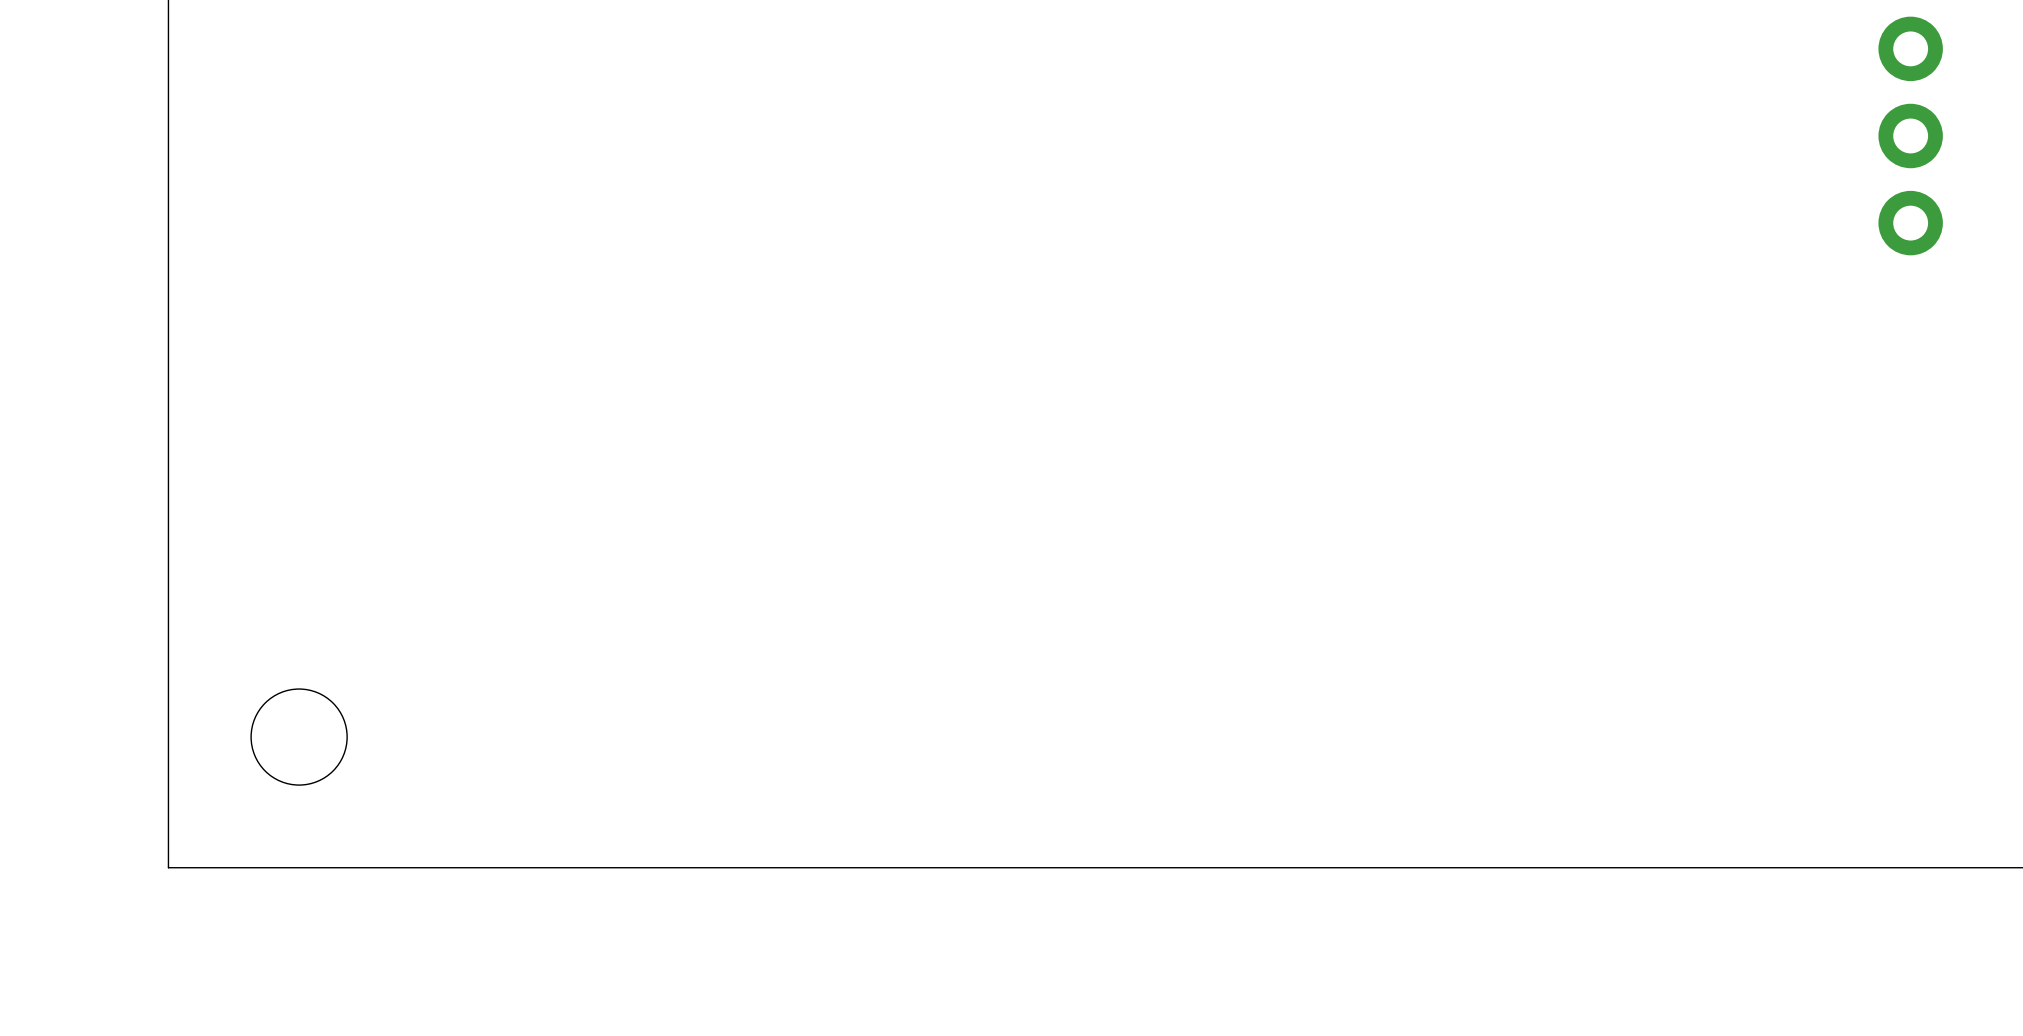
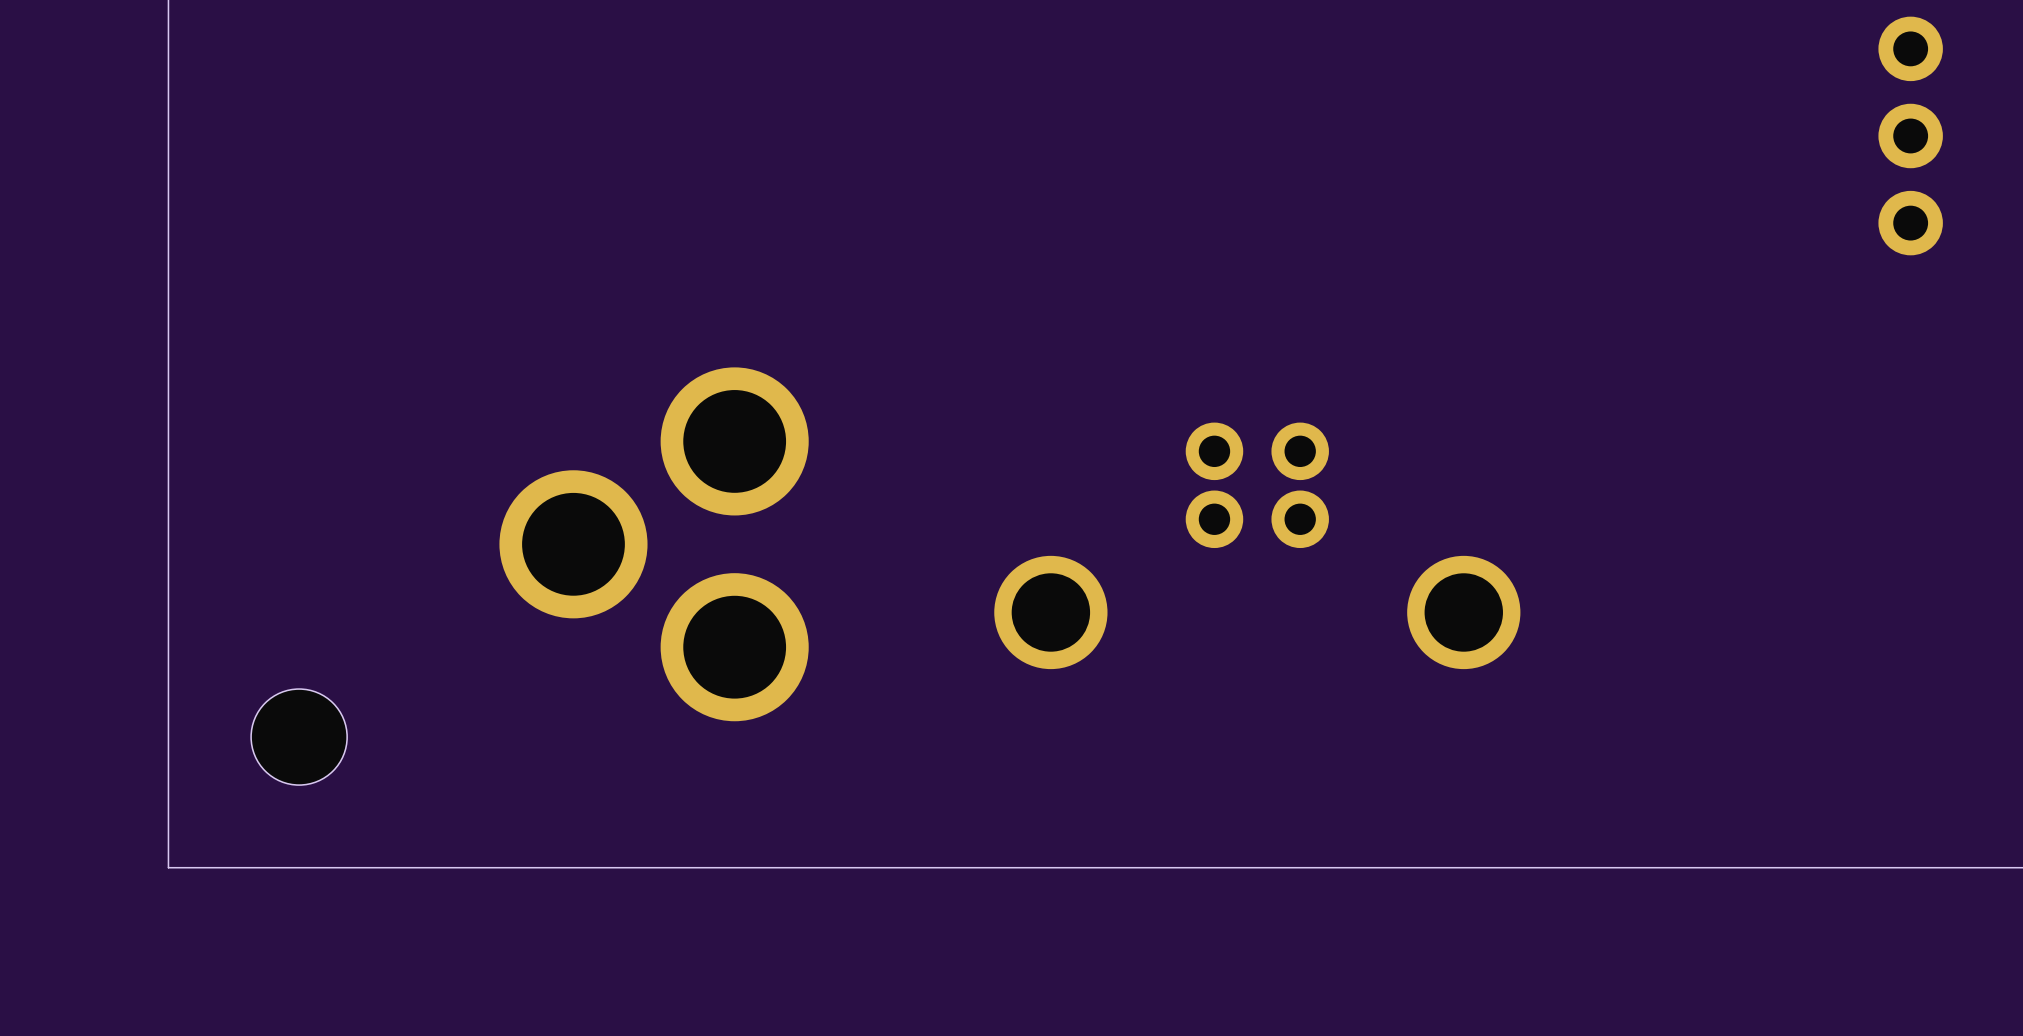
part: none -> (654, 544)
part: none -> (1257, 545)

